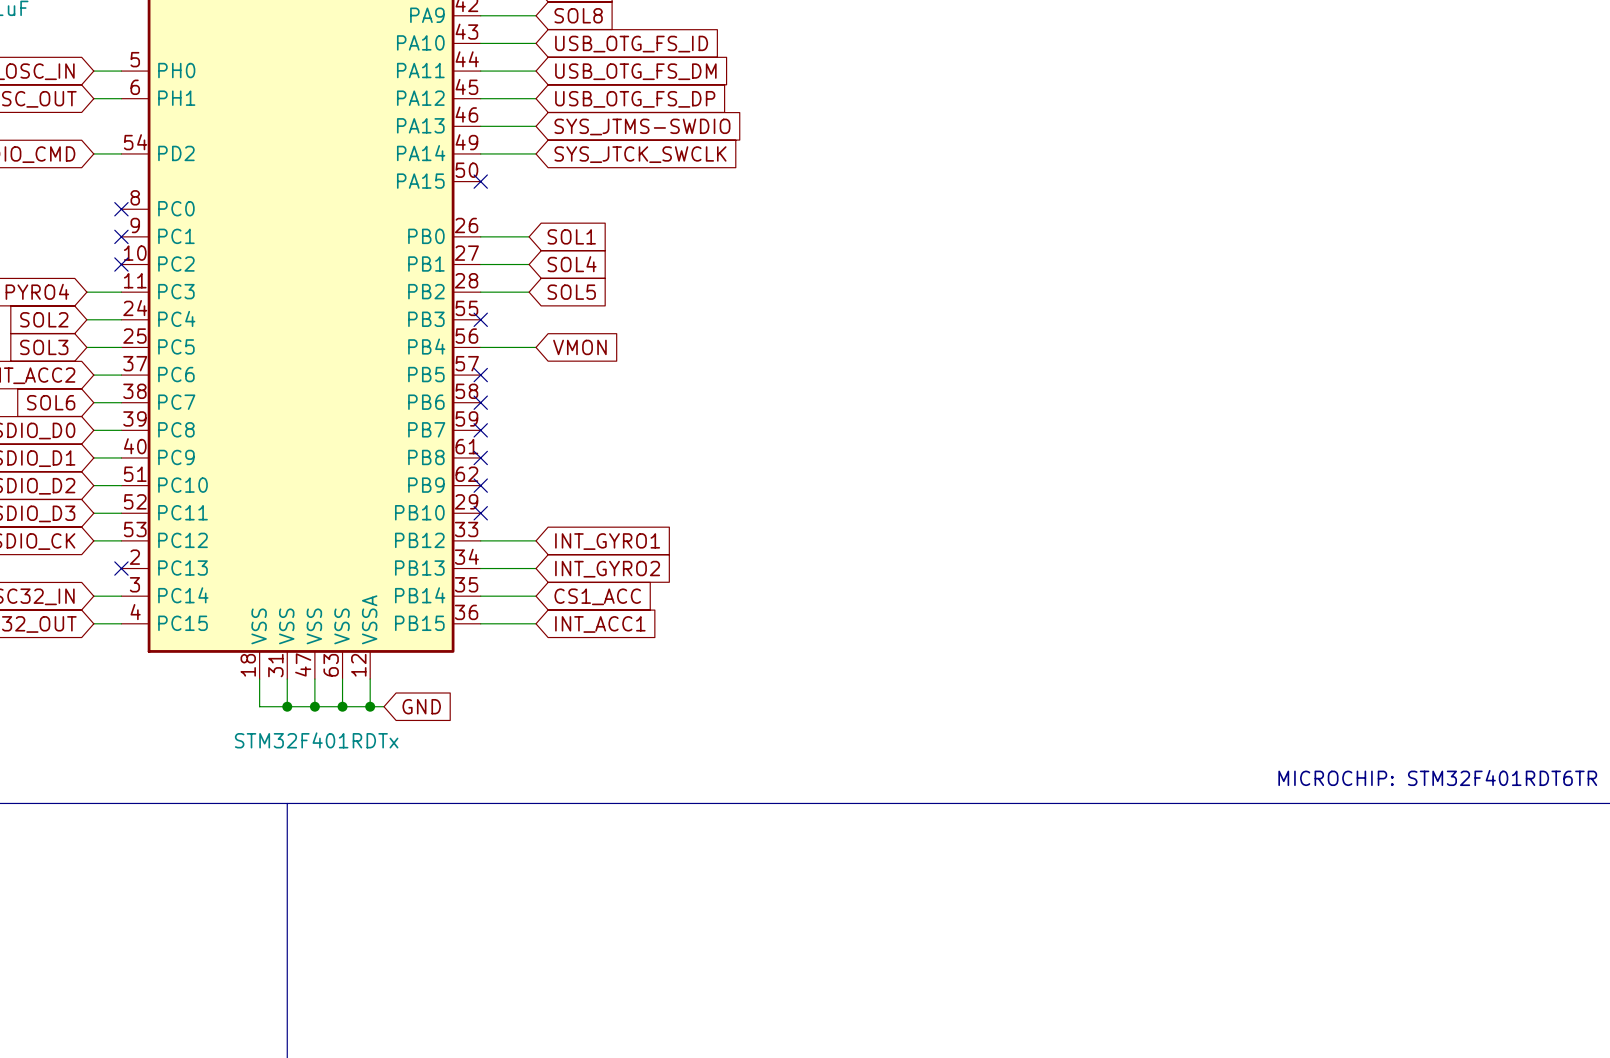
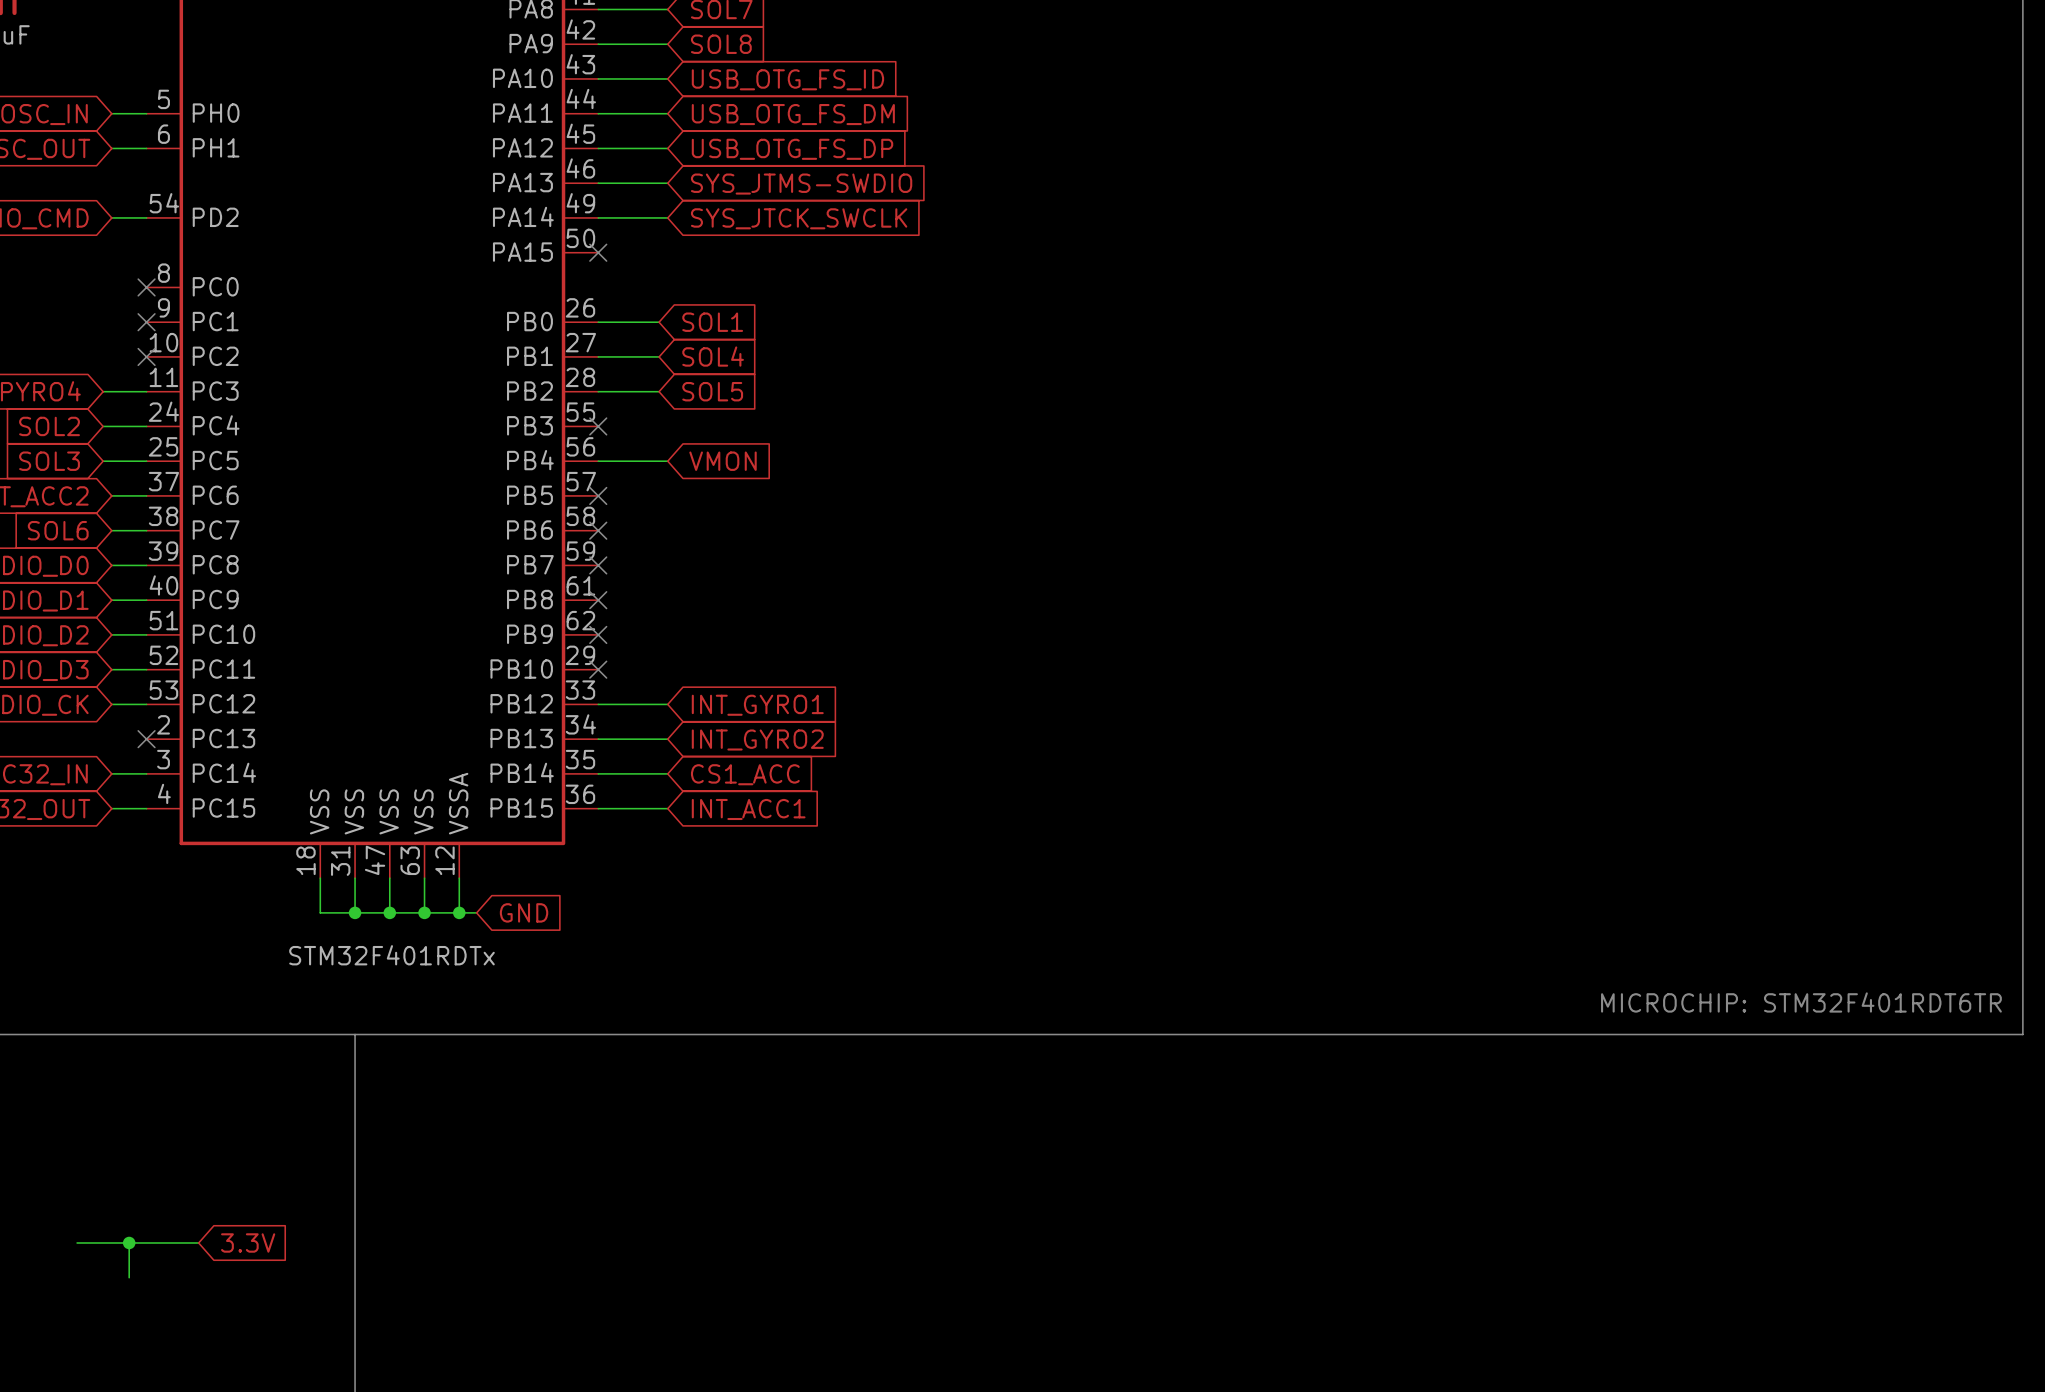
wire: none -> (77, 1242) (198, 1242)
wire: none -> (129, 1242) (129, 1277)
junction: none -> (129, 1242)
global label: none -> 3.3V (248, 1242)

